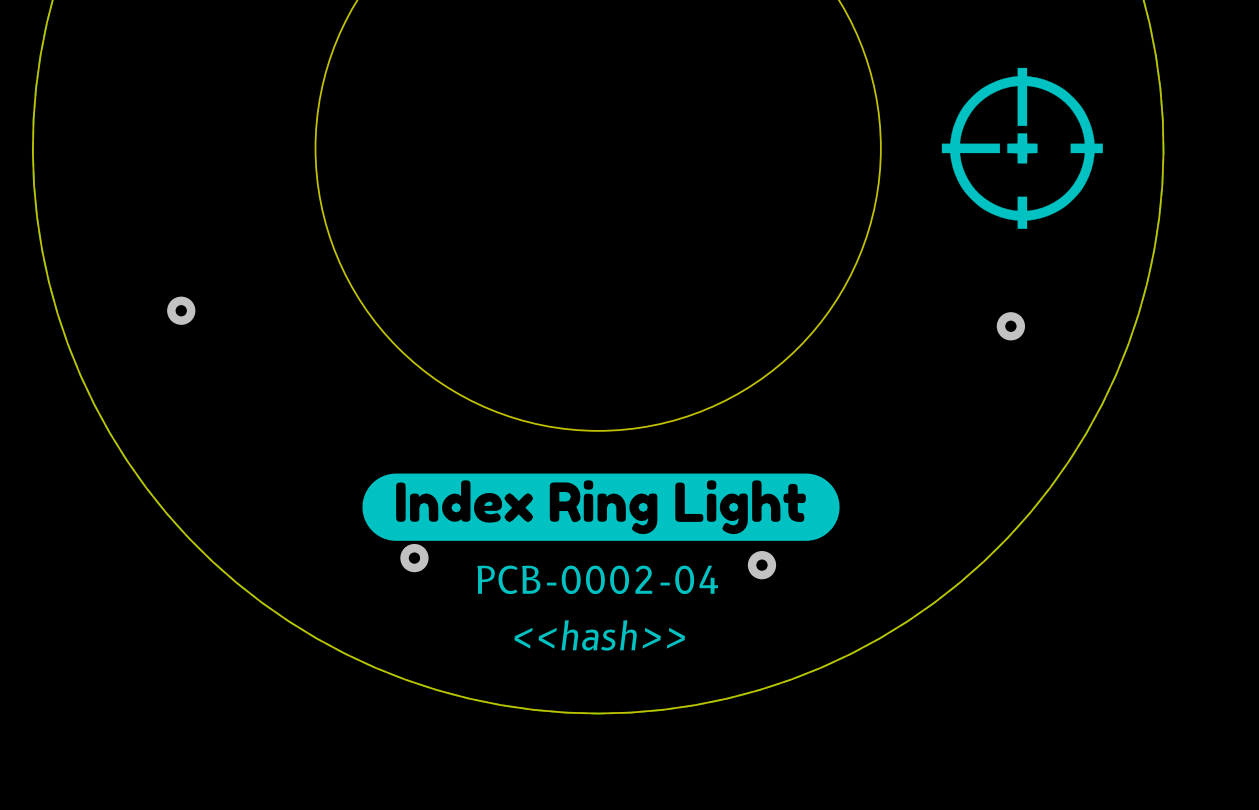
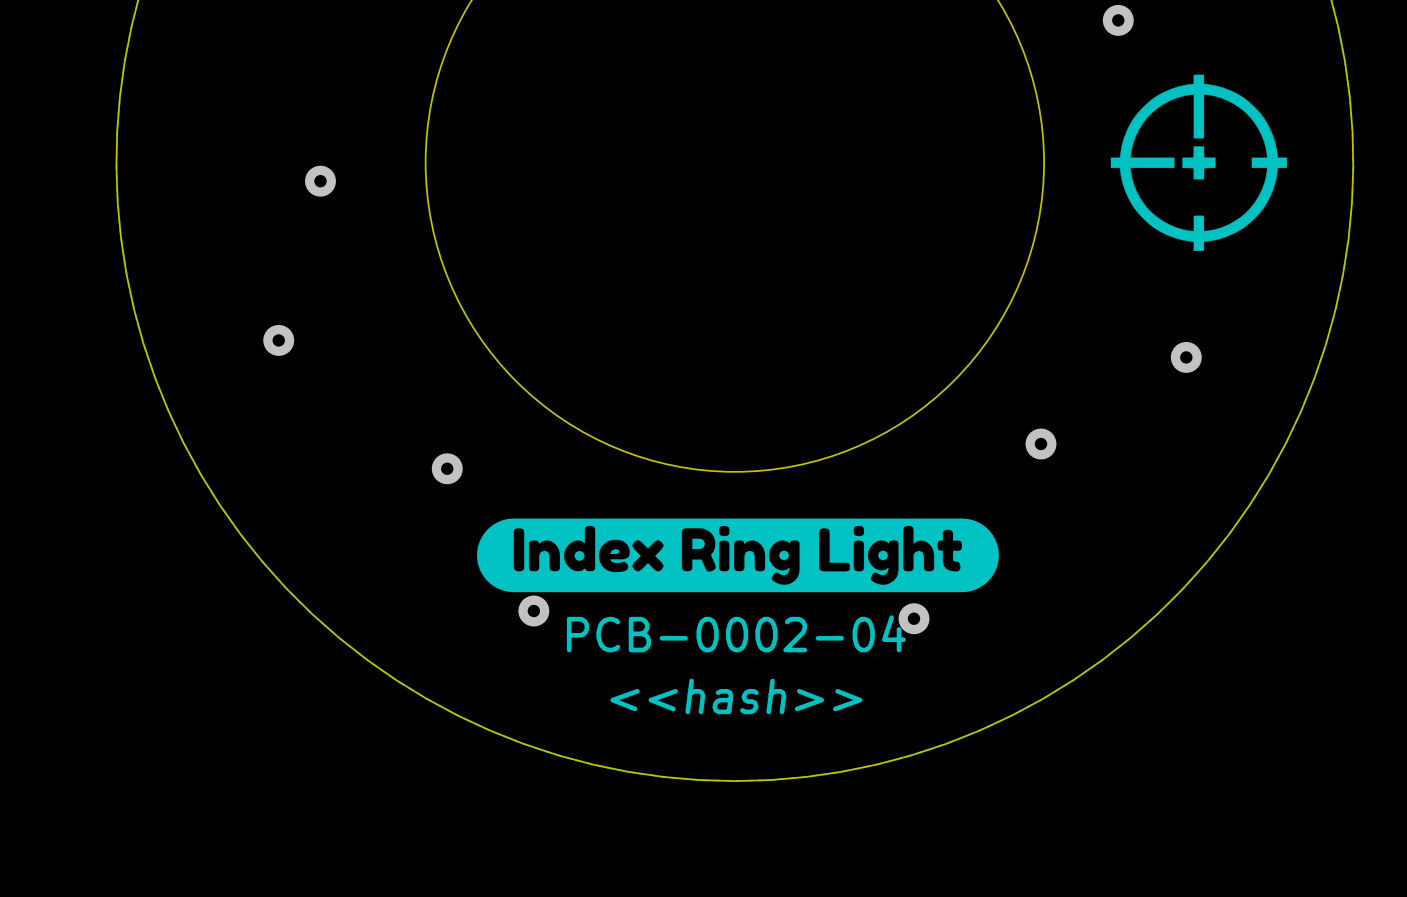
via: none -> (1118, 20)
via: none -> (320, 181)
via: none -> (1040, 444)
via: none -> (447, 468)

